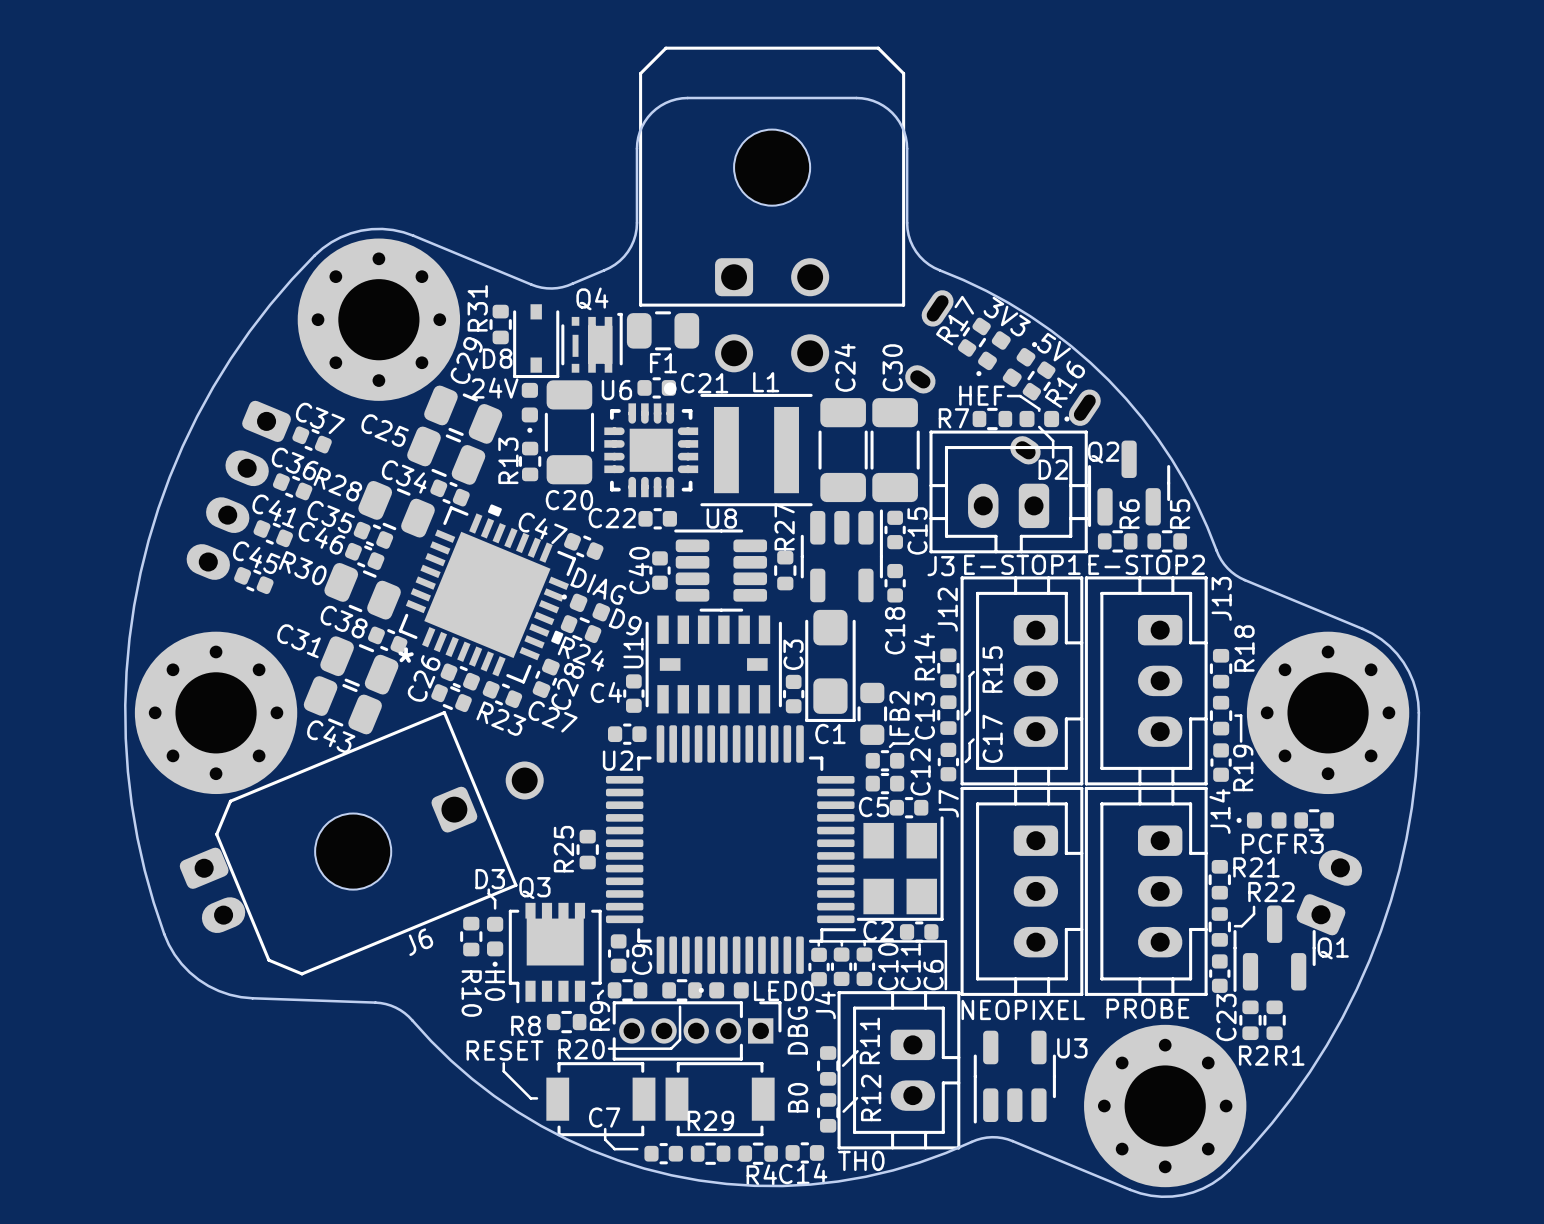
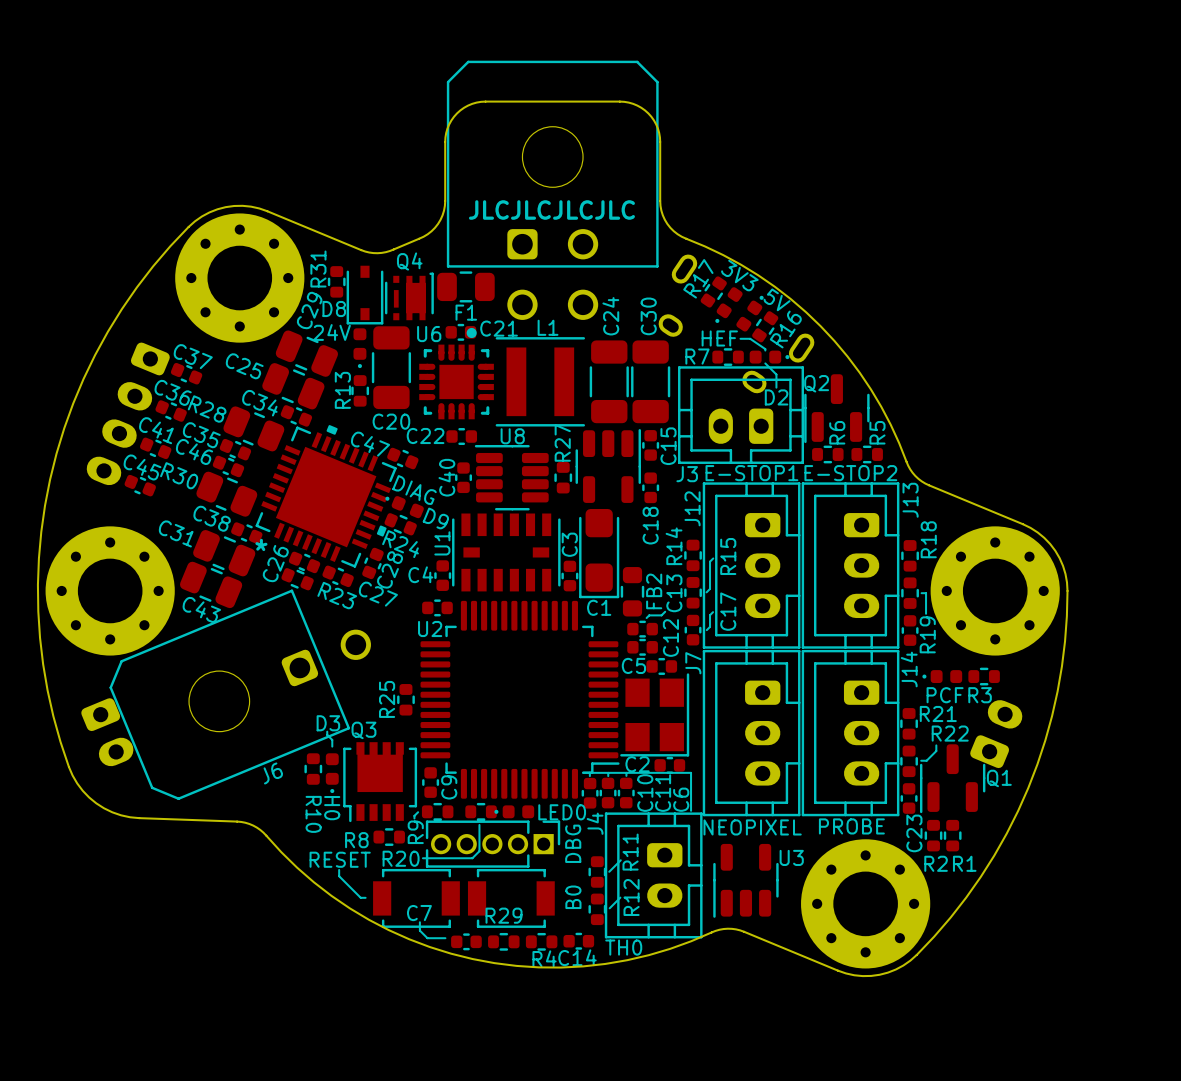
text: none -> JLCJLCJLCJLC (551, 209)

